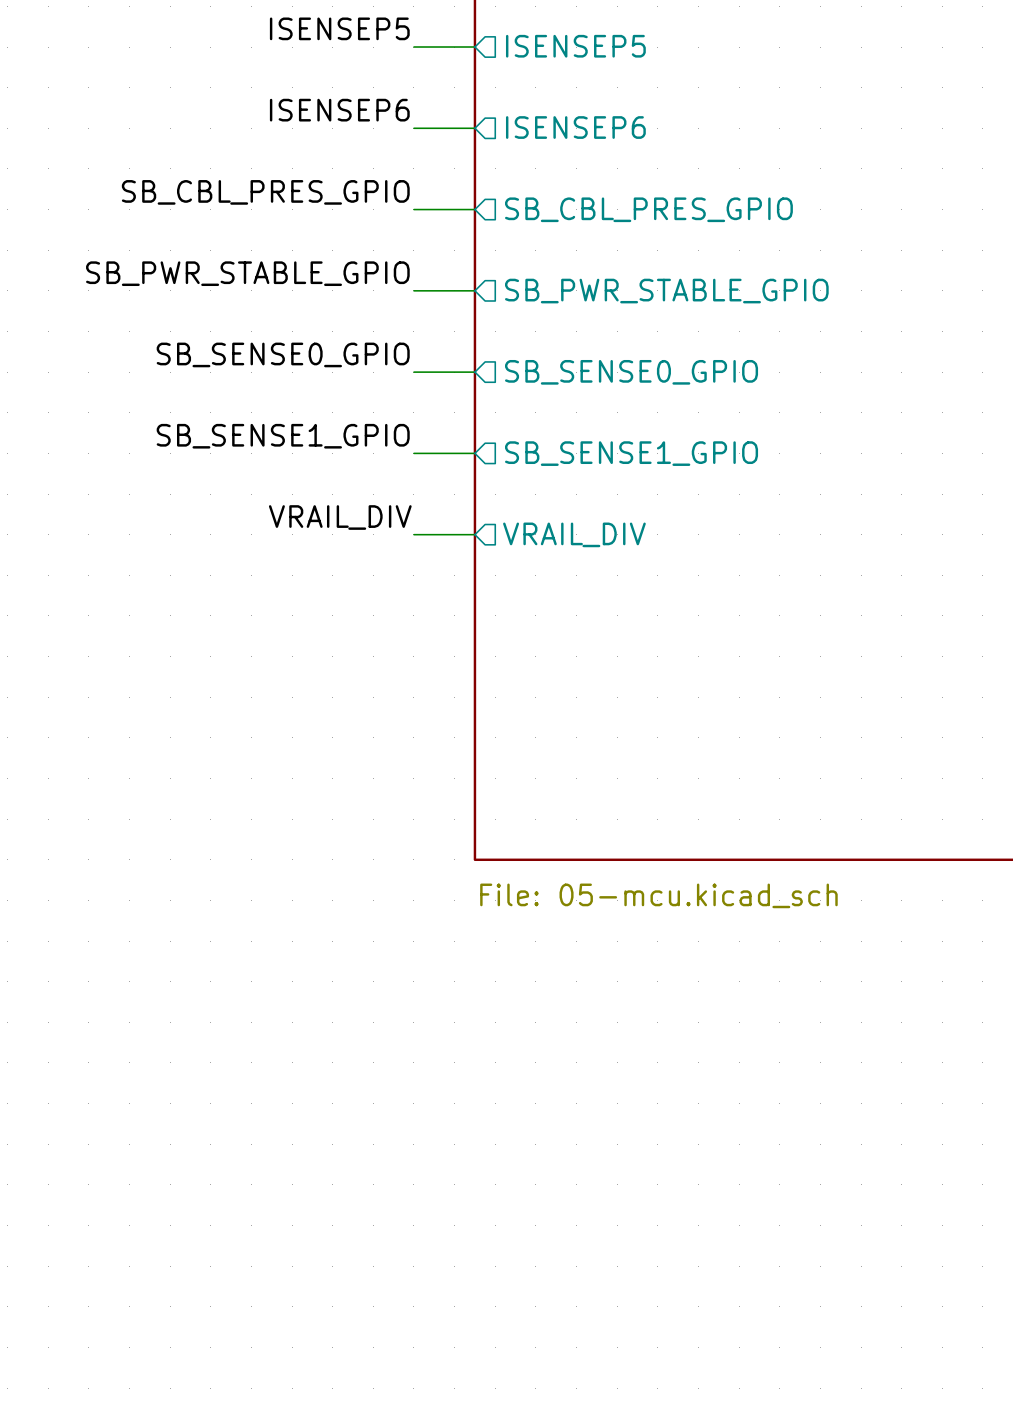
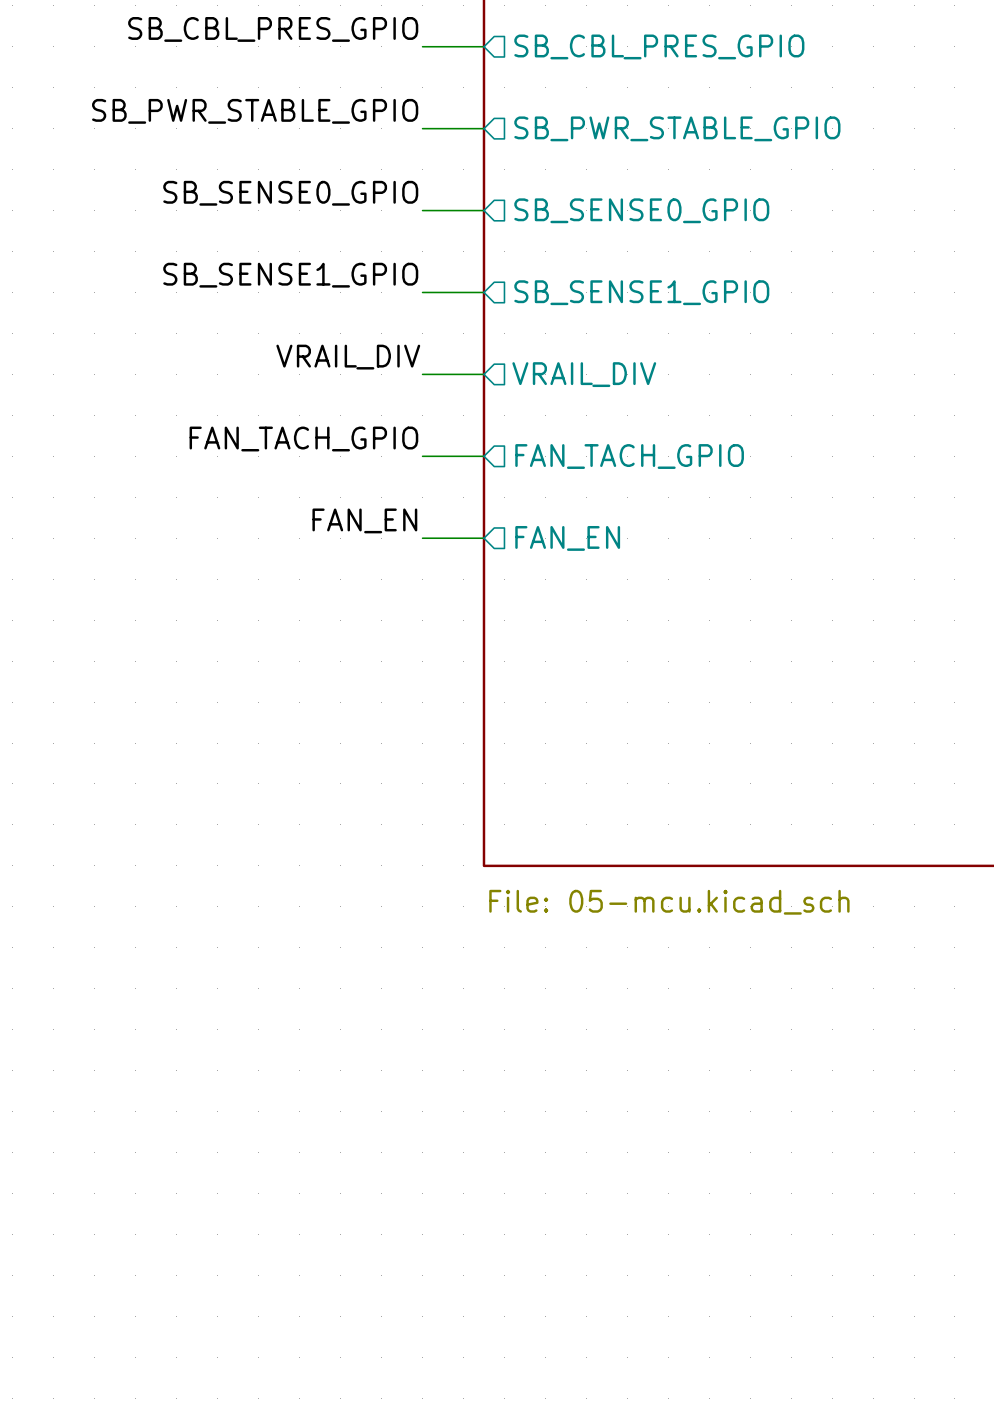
label: ISENSEP5 (339, 28) -> SB_CBL_PRES_GPIO (273, 29)
sheet pin: ISENSEP5 (575, 46) -> SB_CBL_PRES_GPIO (659, 46)
label: ISENSEP6 (339, 110) -> SB_PWR_STABLE_GPIO (255, 111)
sheet pin: ISENSEP6 (575, 127) -> SB_PWR_STABLE_GPIO (677, 128)
label: SB_CBL_PRES_GPIO (265, 192) -> SB_SENSE0_GPIO (290, 193)
sheet pin: SB_CBL_PRES_GPIO (648, 209) -> SB_SENSE0_GPIO (641, 210)
label: SB_PWR_STABLE_GPIO (247, 273) -> SB_SENSE1_GPIO (290, 275)
sheet pin: SB_PWR_STABLE_GPIO (666, 291) -> SB_SENSE1_GPIO (641, 292)
label: SB_SENSE0_GPIO (283, 354) -> VRAIL_DIV (348, 357)
sheet pin: SB_SENSE0_GPIO (631, 372) -> VRAIL_DIV (584, 374)
label: SB_SENSE1_GPIO (283, 436) -> FAN_TACH_GPIO (303, 439)
sheet pin: SB_SENSE1_GPIO (631, 453) -> FAN_TACH_GPIO (629, 456)
label: VRAIL_DIV (340, 517) -> FAN_EN (364, 520)
sheet pin: VRAIL_DIV (574, 534) -> FAN_EN (567, 538)

